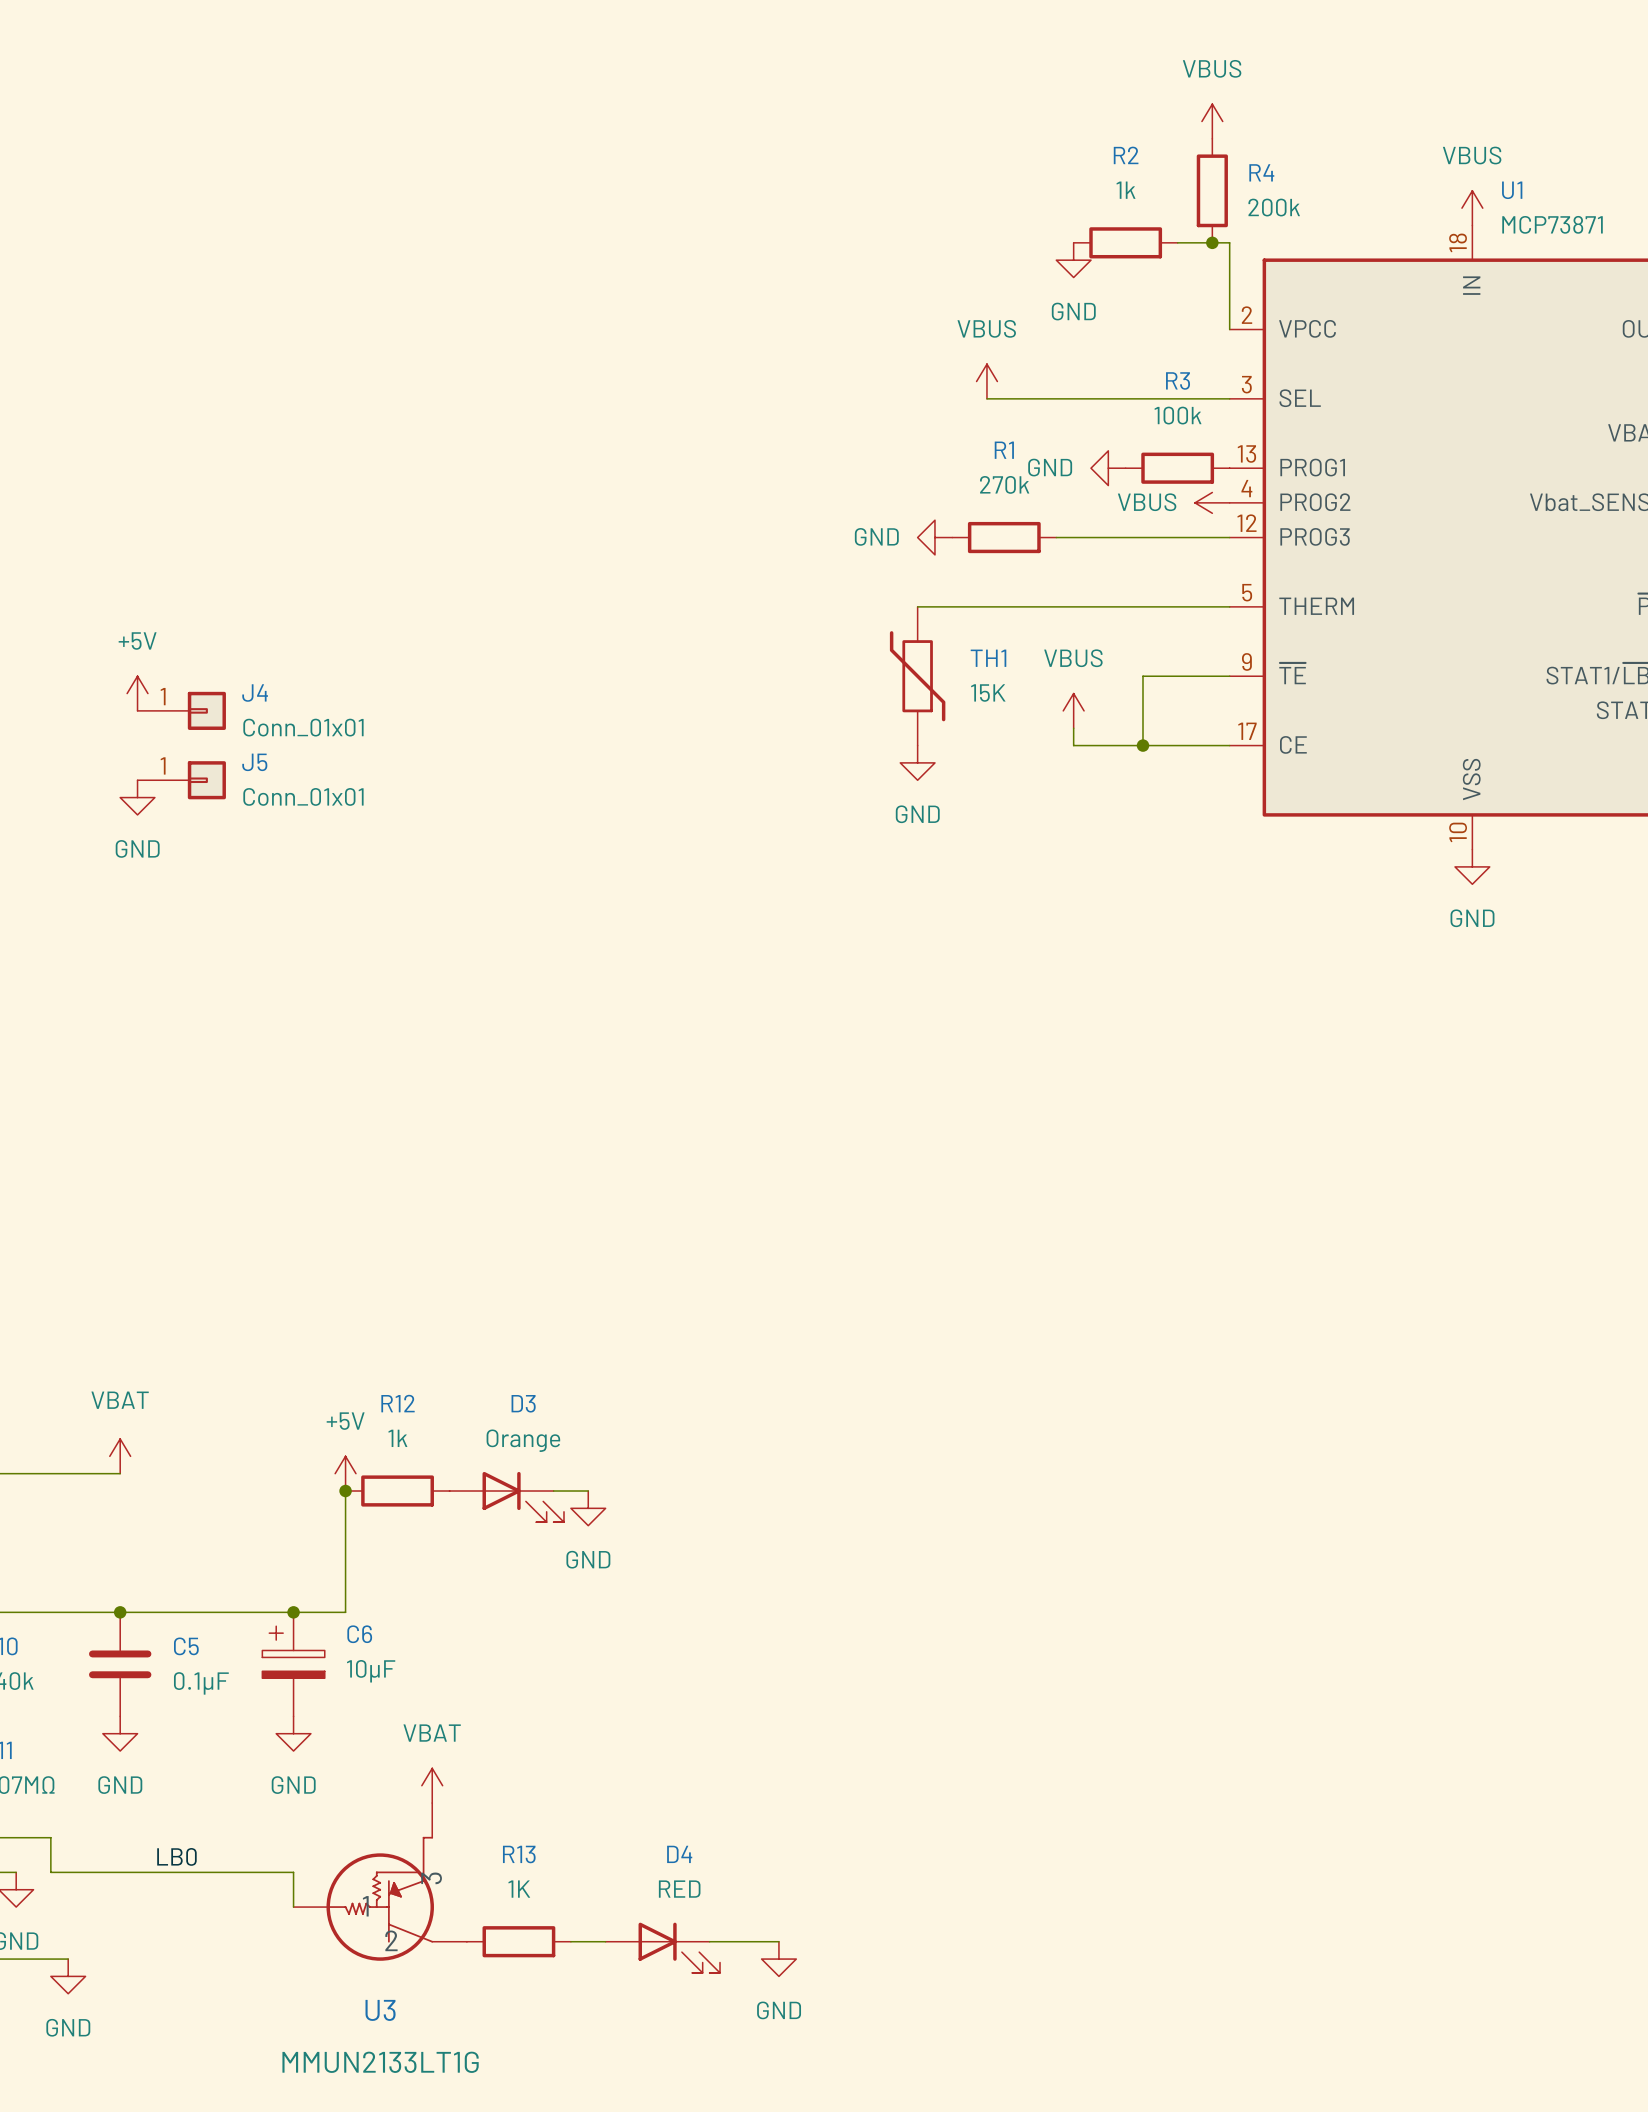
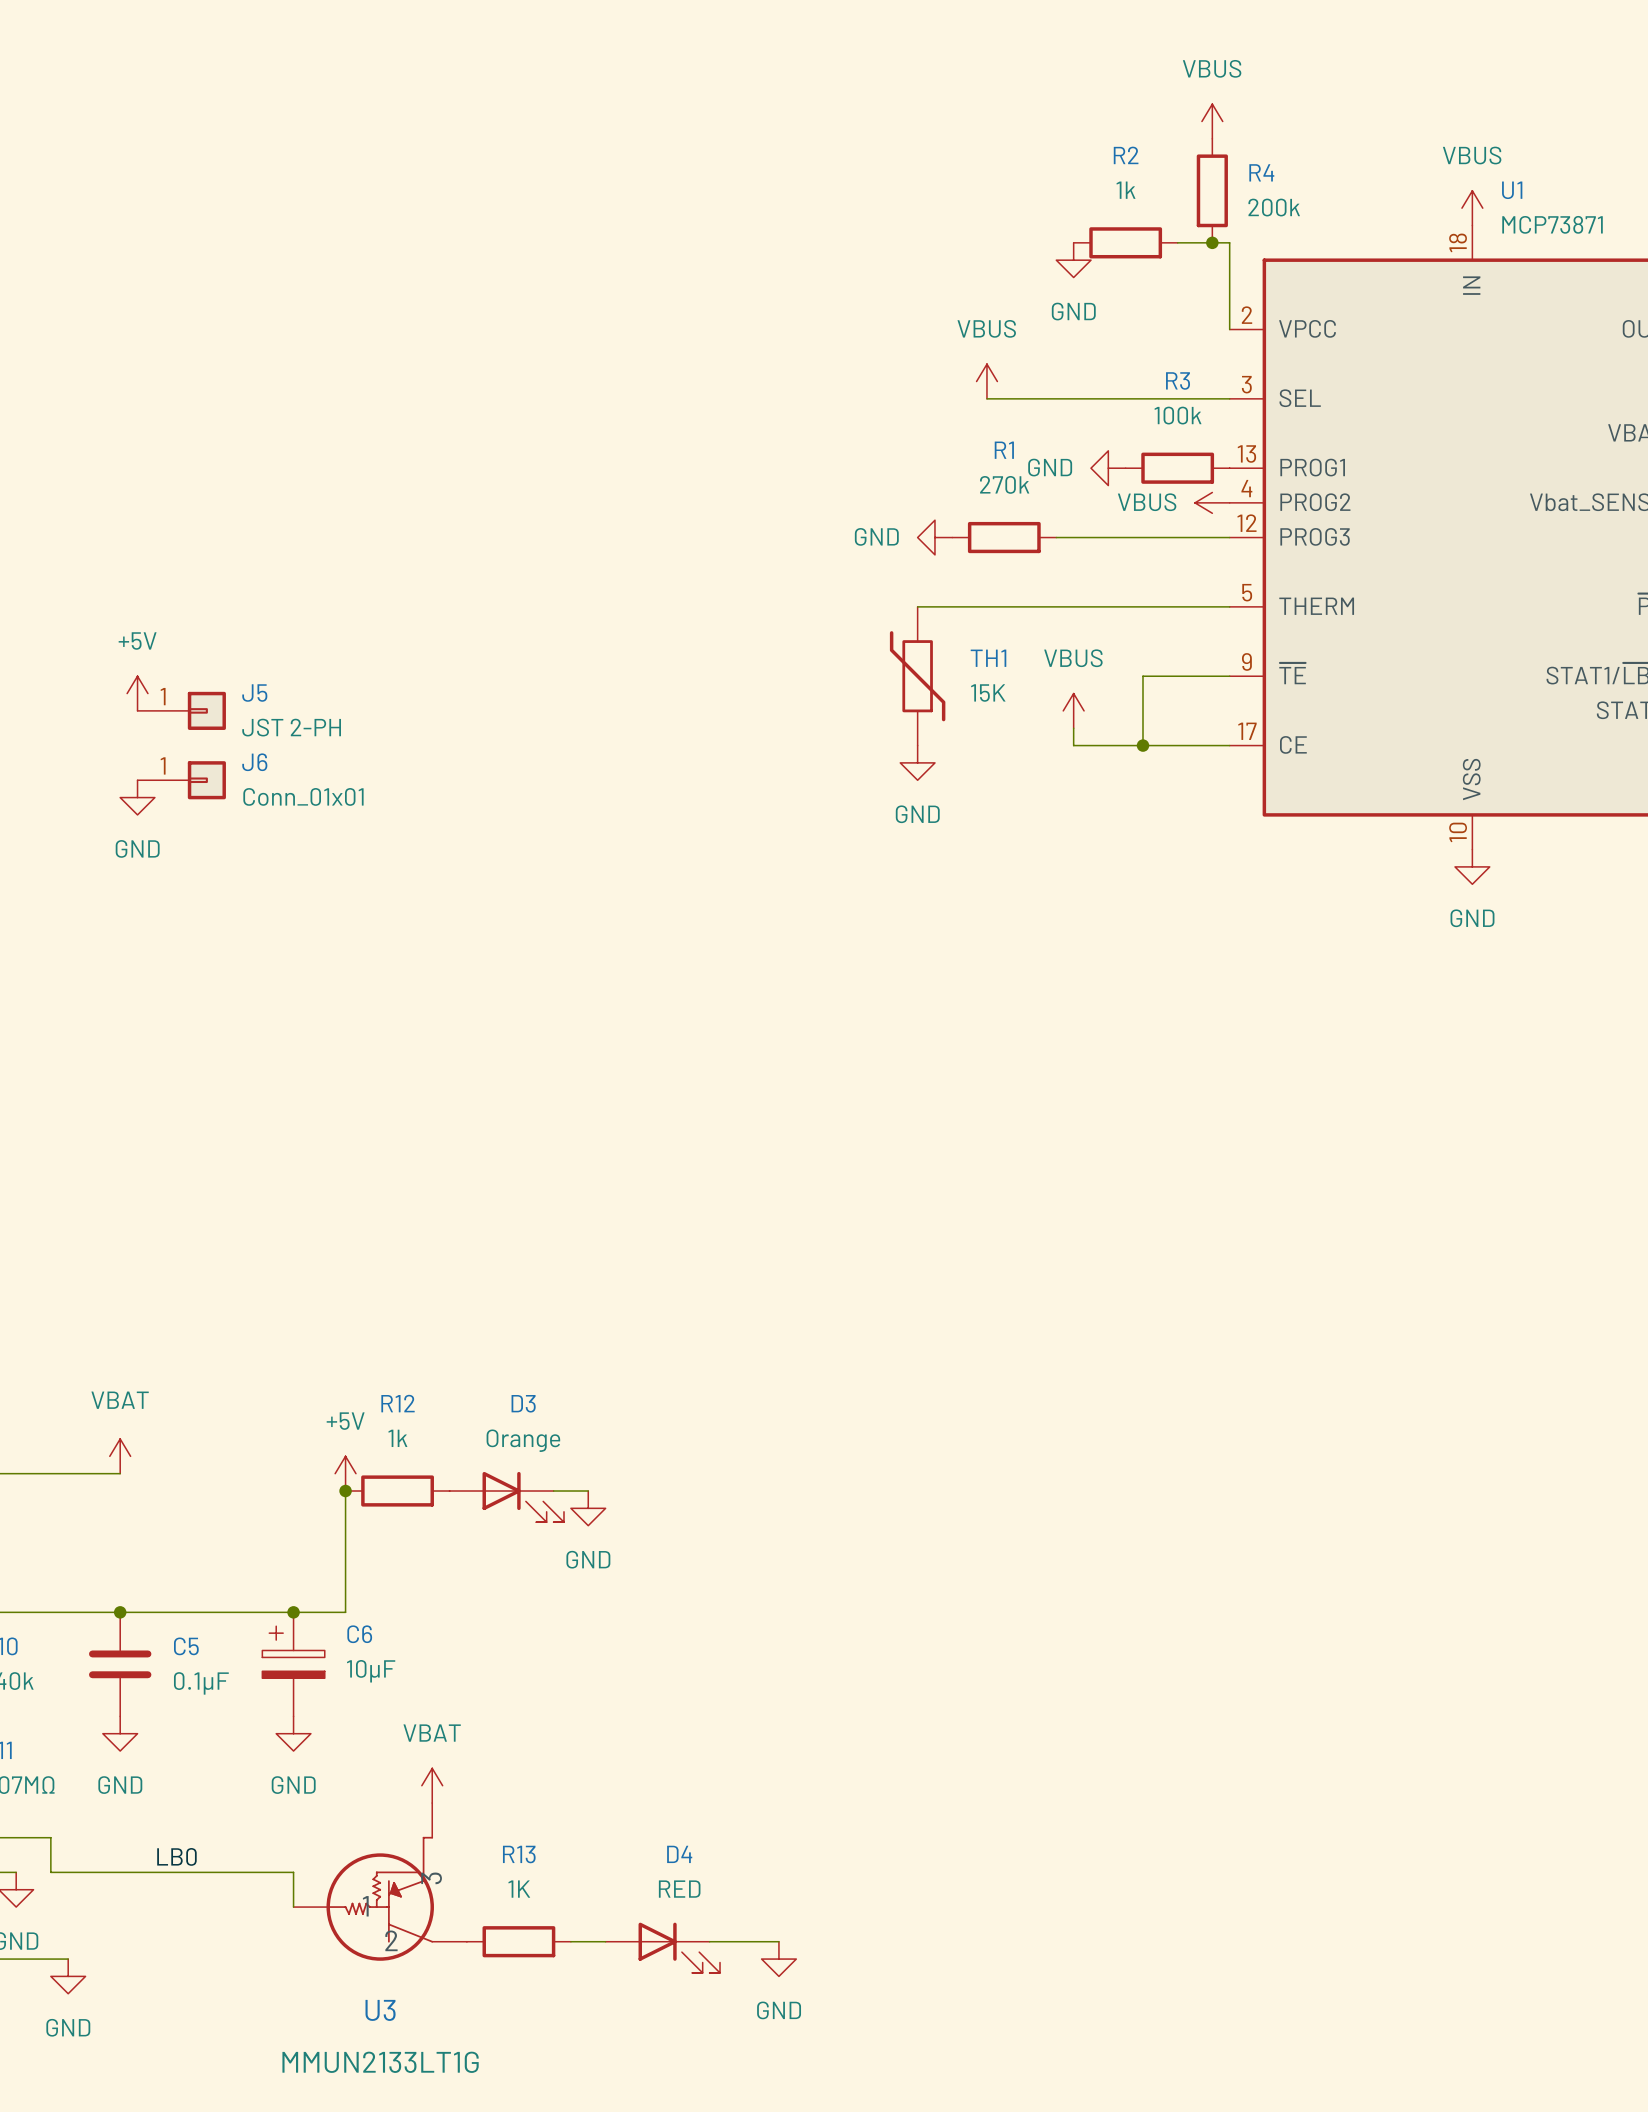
J4 name: J4 (255, 693) -> J5 (254, 693)
J4 value: Conn_01x01 (303, 727) -> JST 2-PH (291, 727)
J5 name: J5 (254, 762) -> J6 (254, 762)

